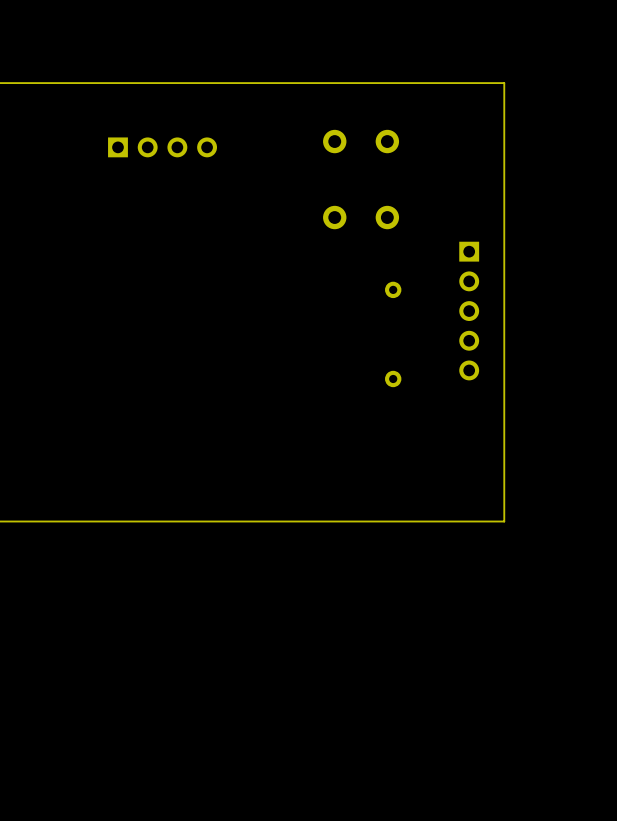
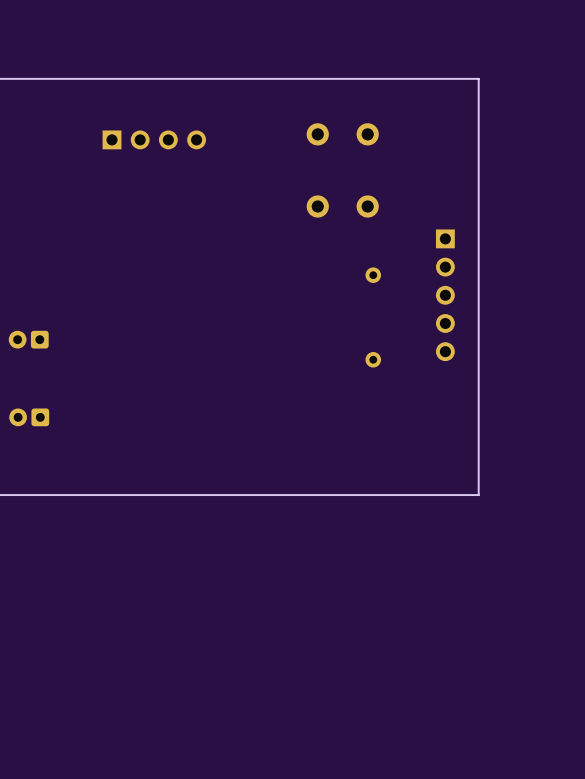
part: none -> (28, 339)
part: none -> (29, 417)

